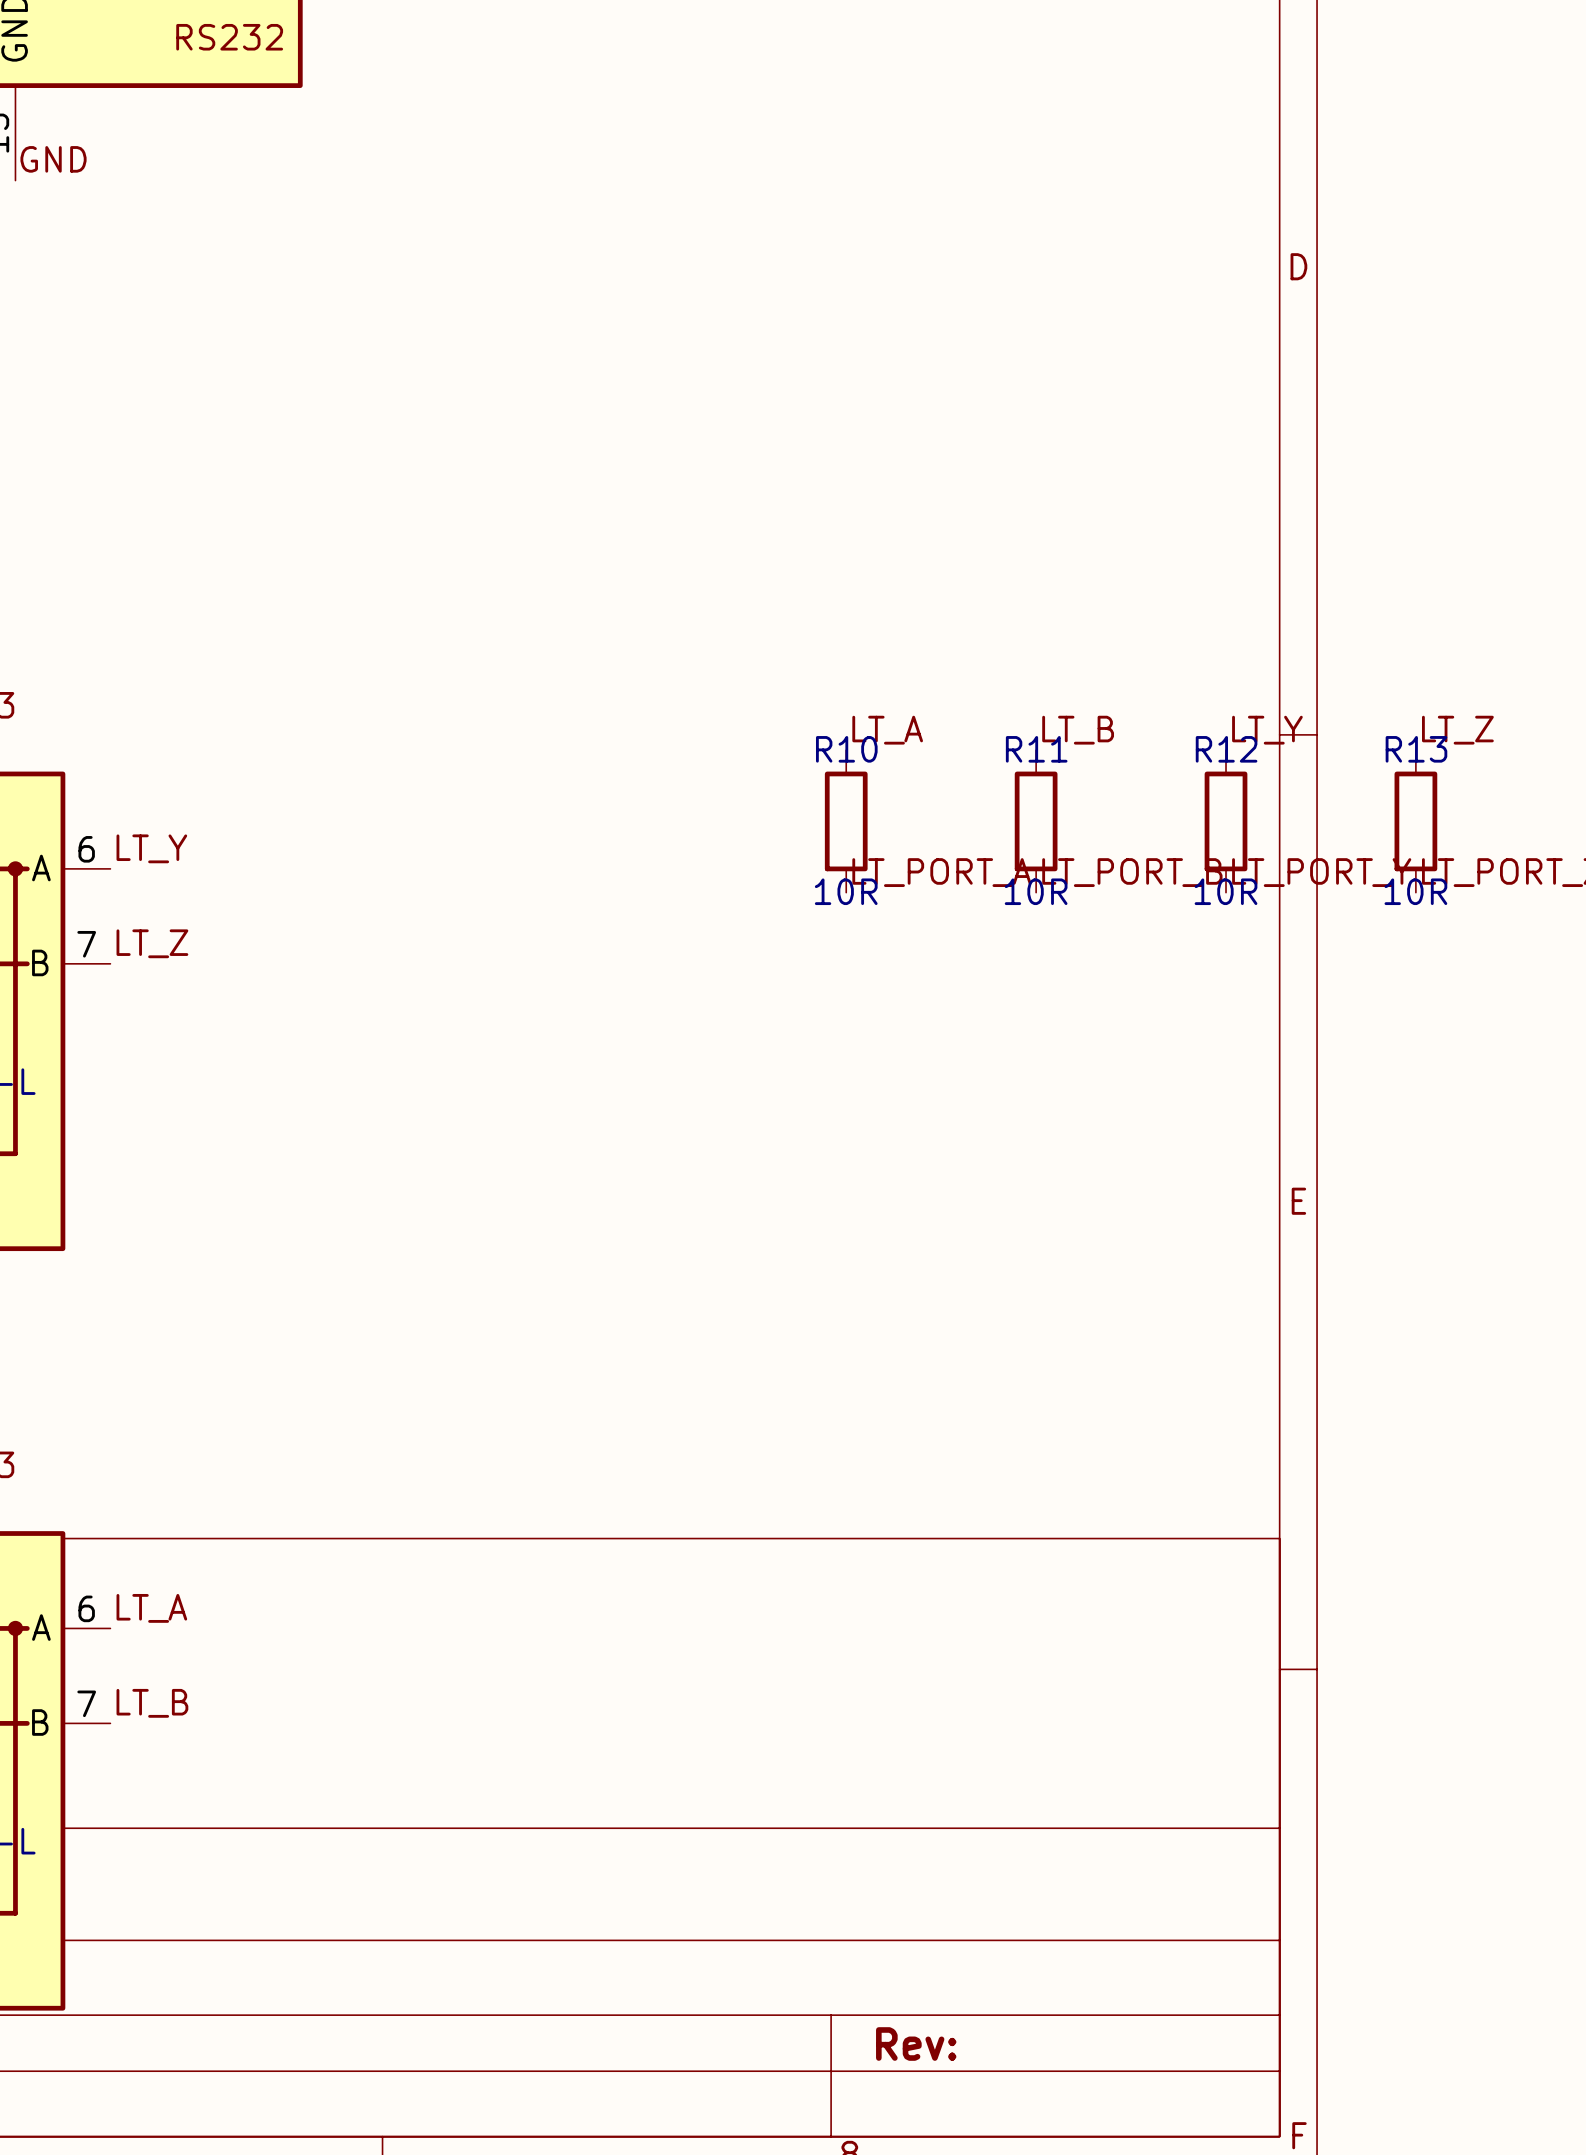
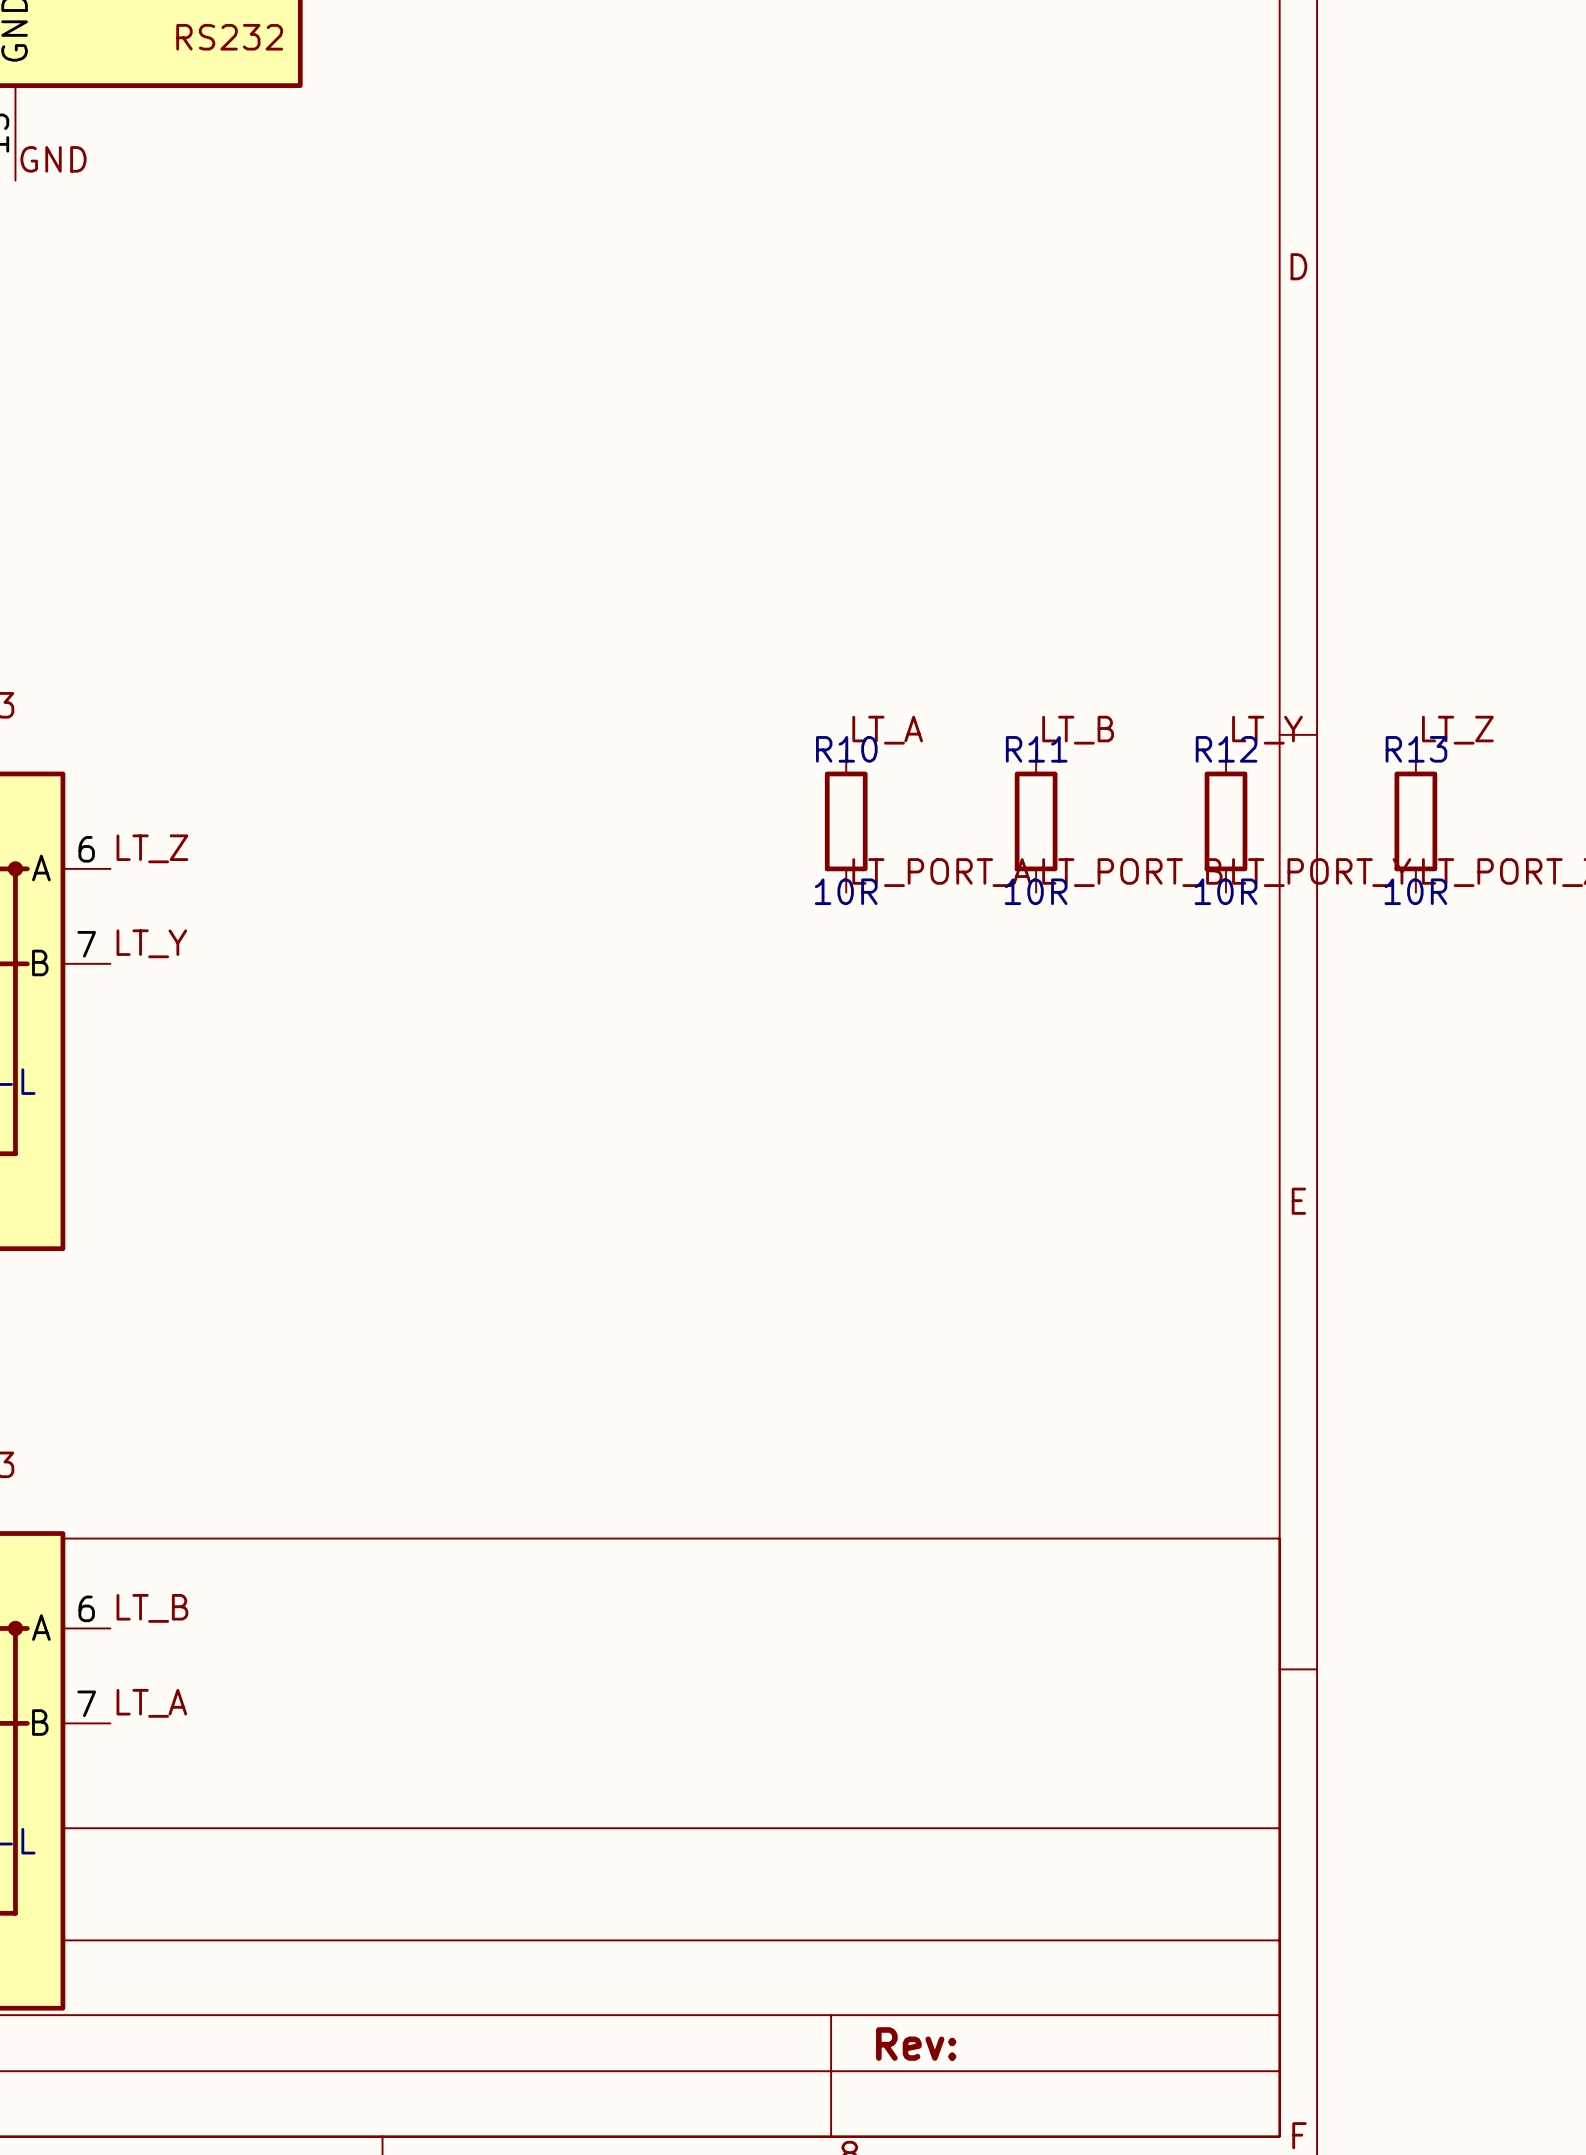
label: LT_Y (151, 848) -> LT_Z (152, 848)
label: LT_Z (152, 943) -> LT_Y (151, 943)
label: LT_A (151, 1608) -> LT_B (152, 1608)
label: LT_B (152, 1703) -> LT_A (151, 1703)

